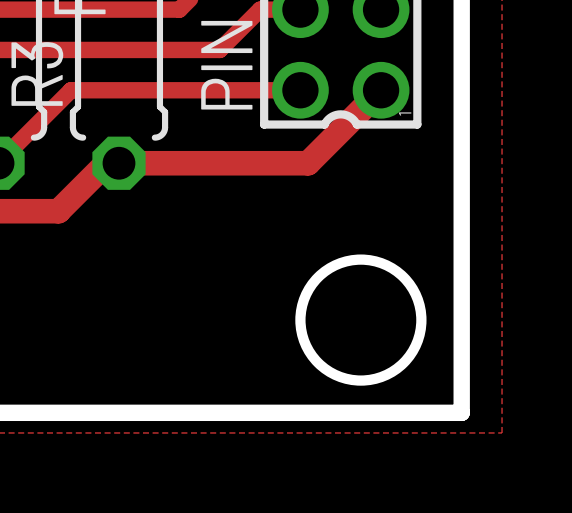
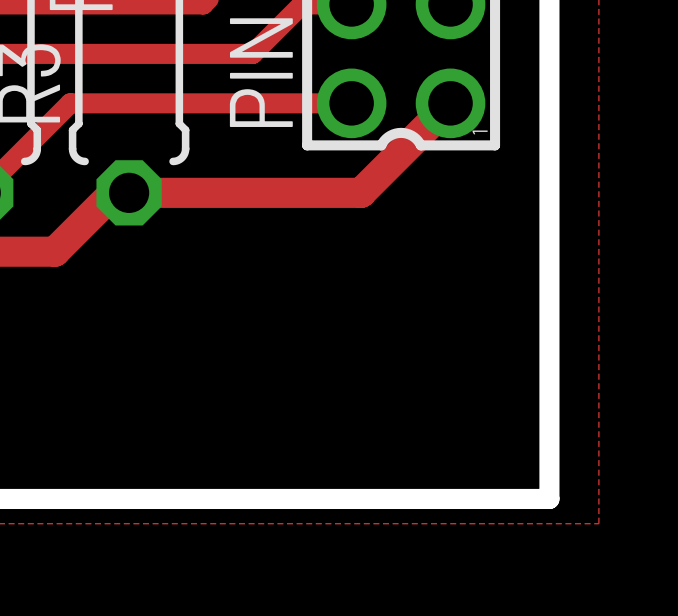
round board edge: [295, 254, 427, 386] -> none

